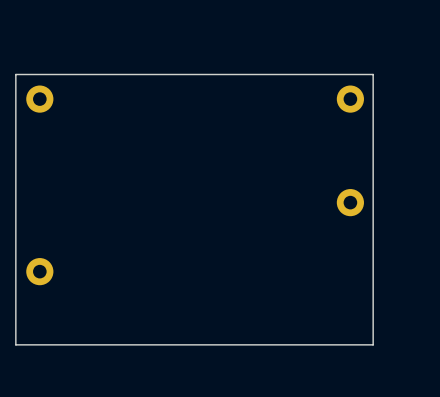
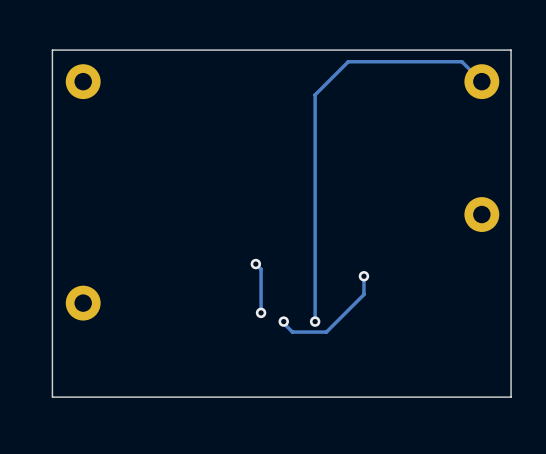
track: none -> (481, 81) (461, 61) (348, 61) (315, 94) (315, 321)
track: none -> (255, 264) (261, 269) (261, 312)
via: none -> (255, 264)
track: none -> (363, 276) (363, 294) (326, 332) (292, 332) (283, 321)
via: none -> (363, 276)
via: none -> (261, 312)
via: none -> (283, 321)
via: none -> (315, 321)

